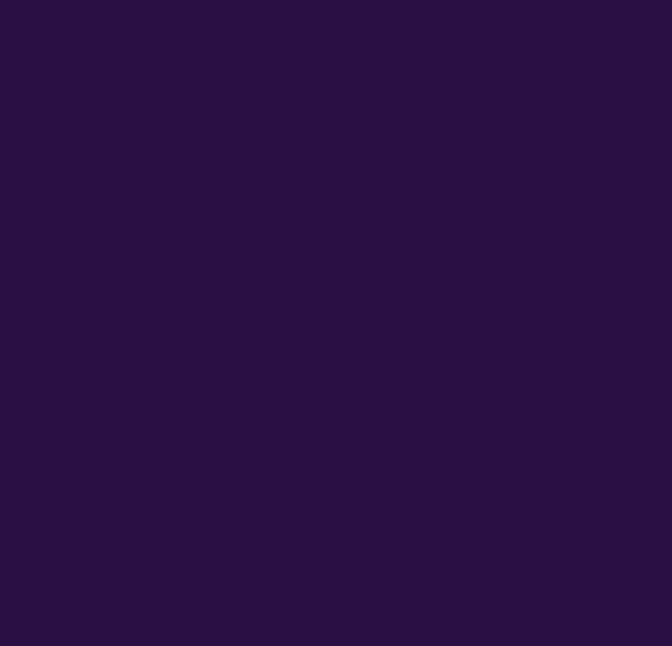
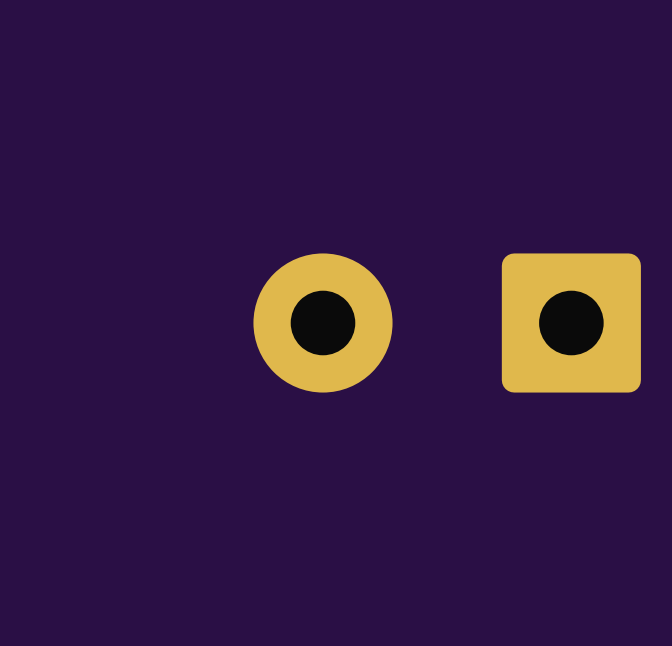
part: none -> (447, 322)

